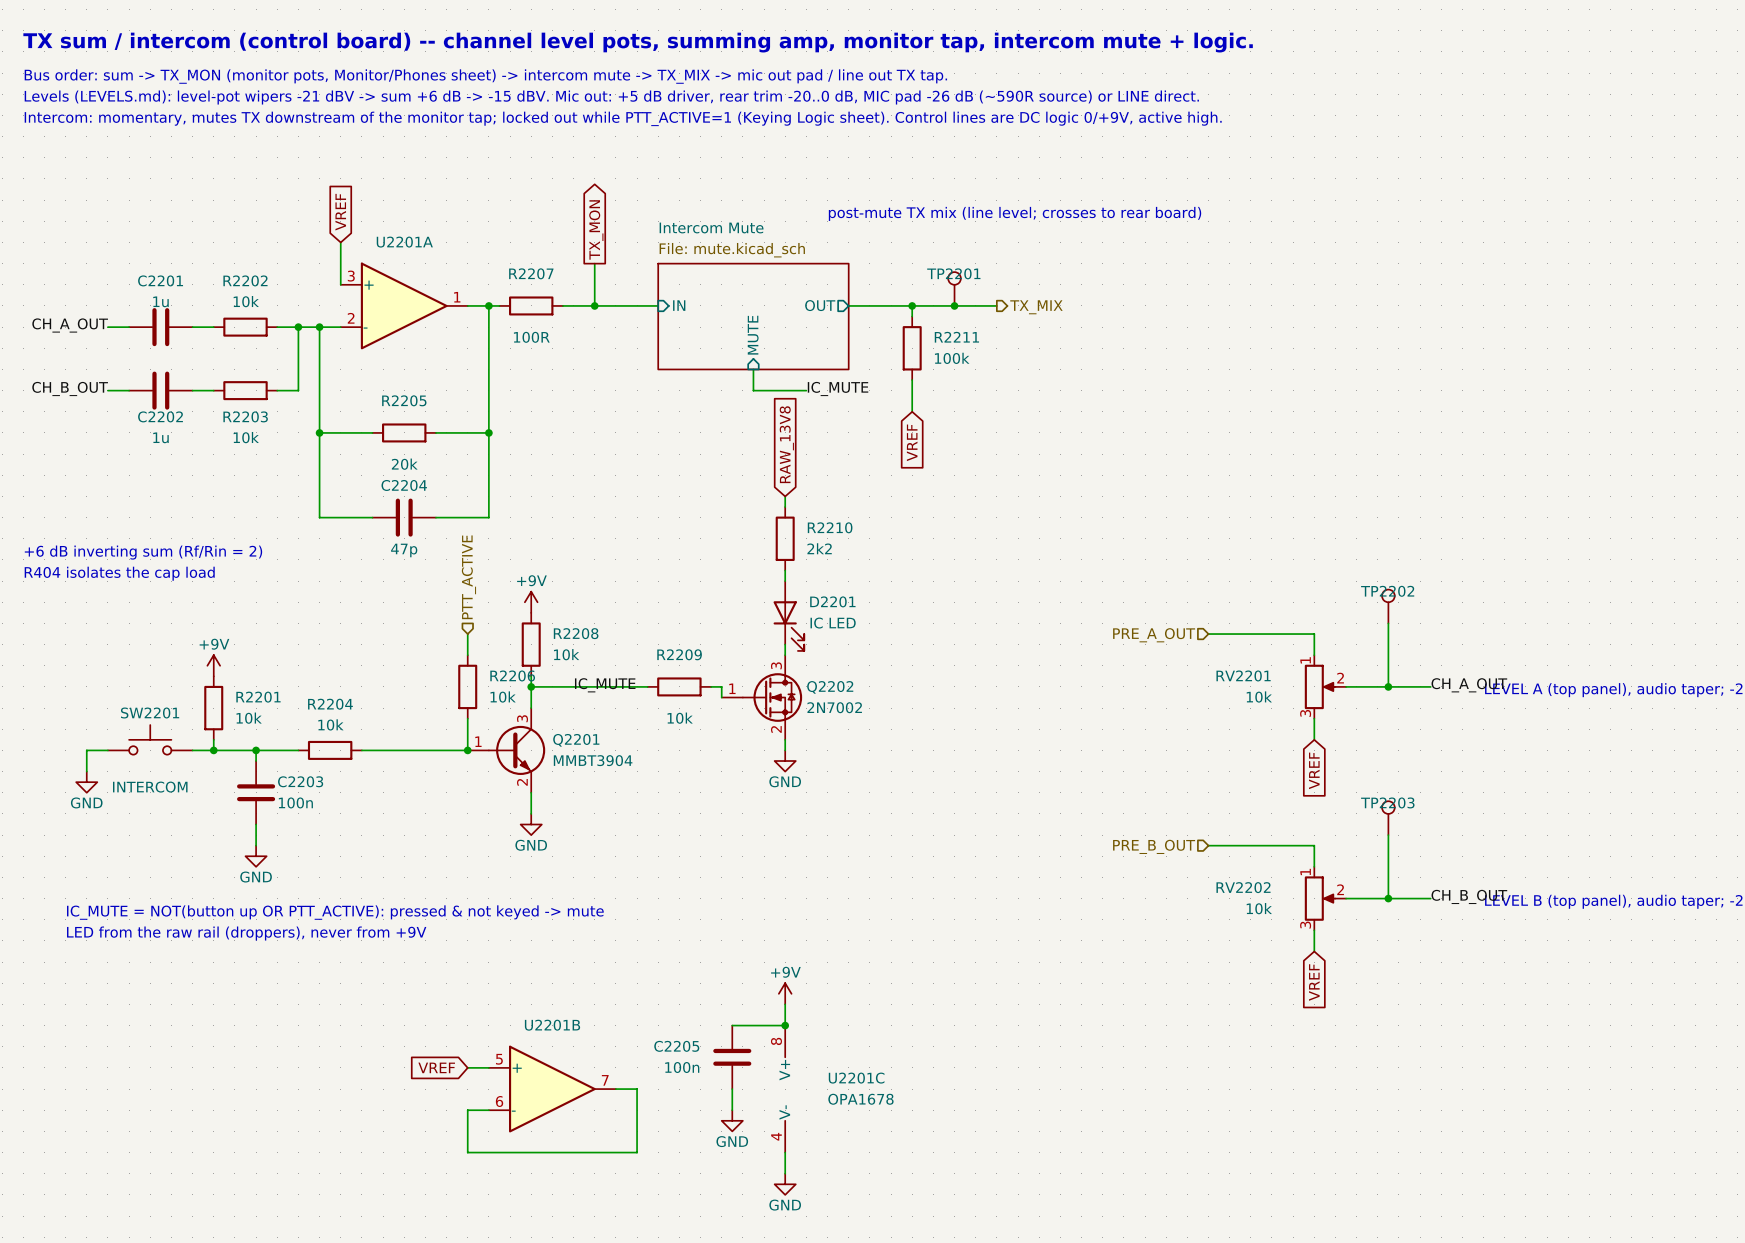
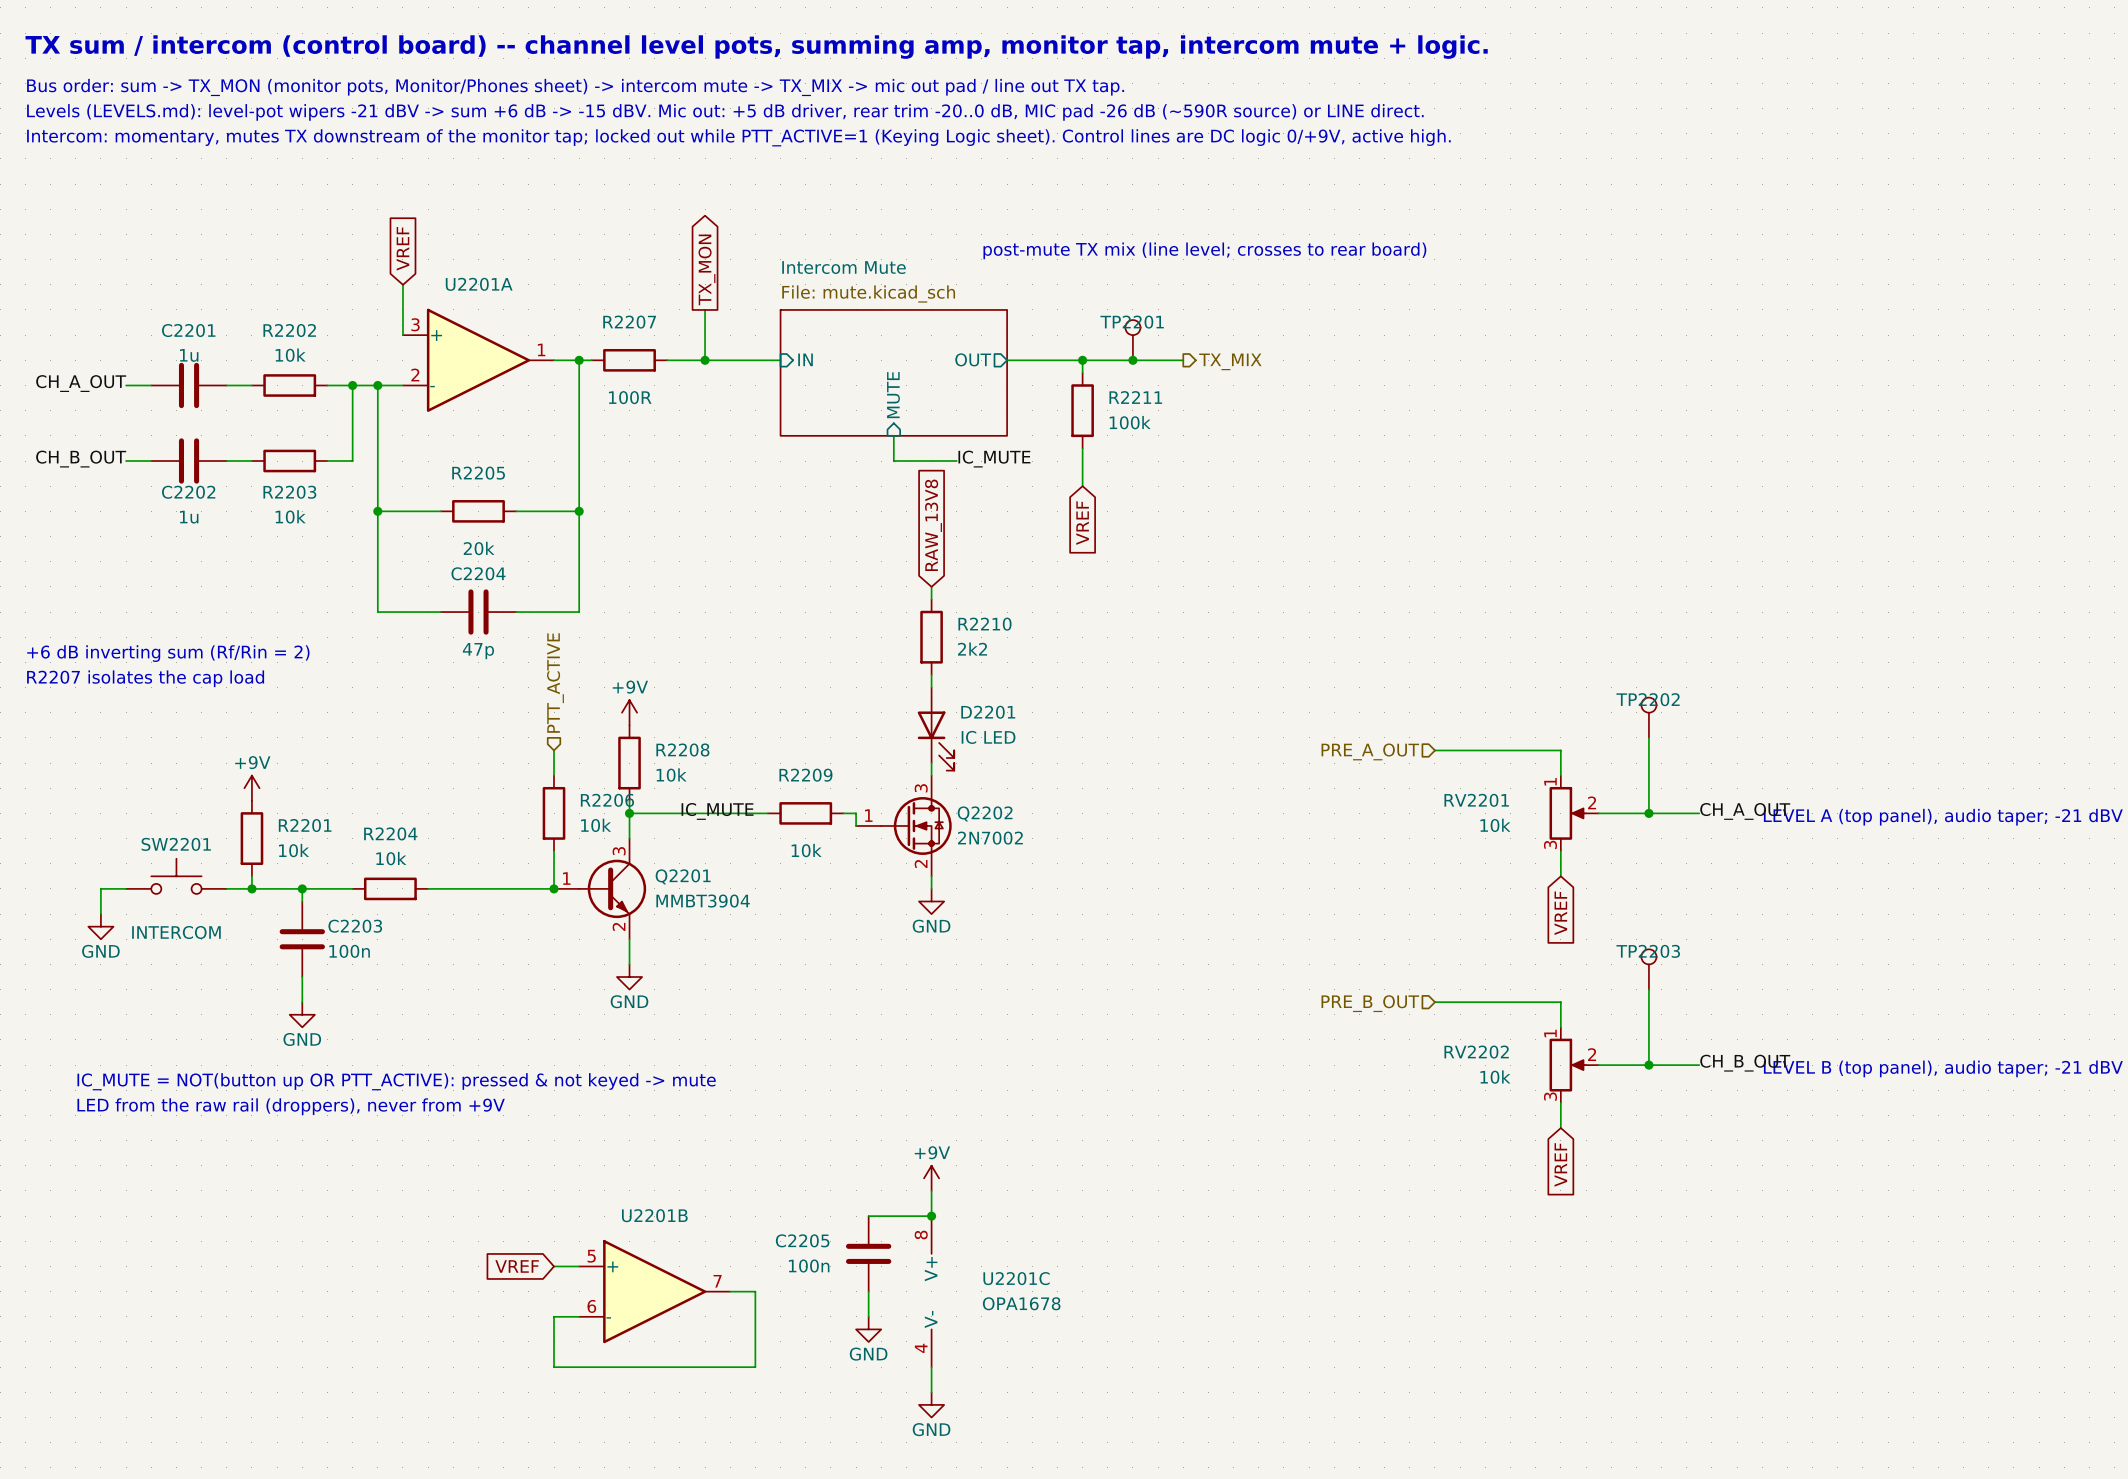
text: R404 isolates the cap load (119, 573) -> R2207 isolates the cap load (145, 678)

